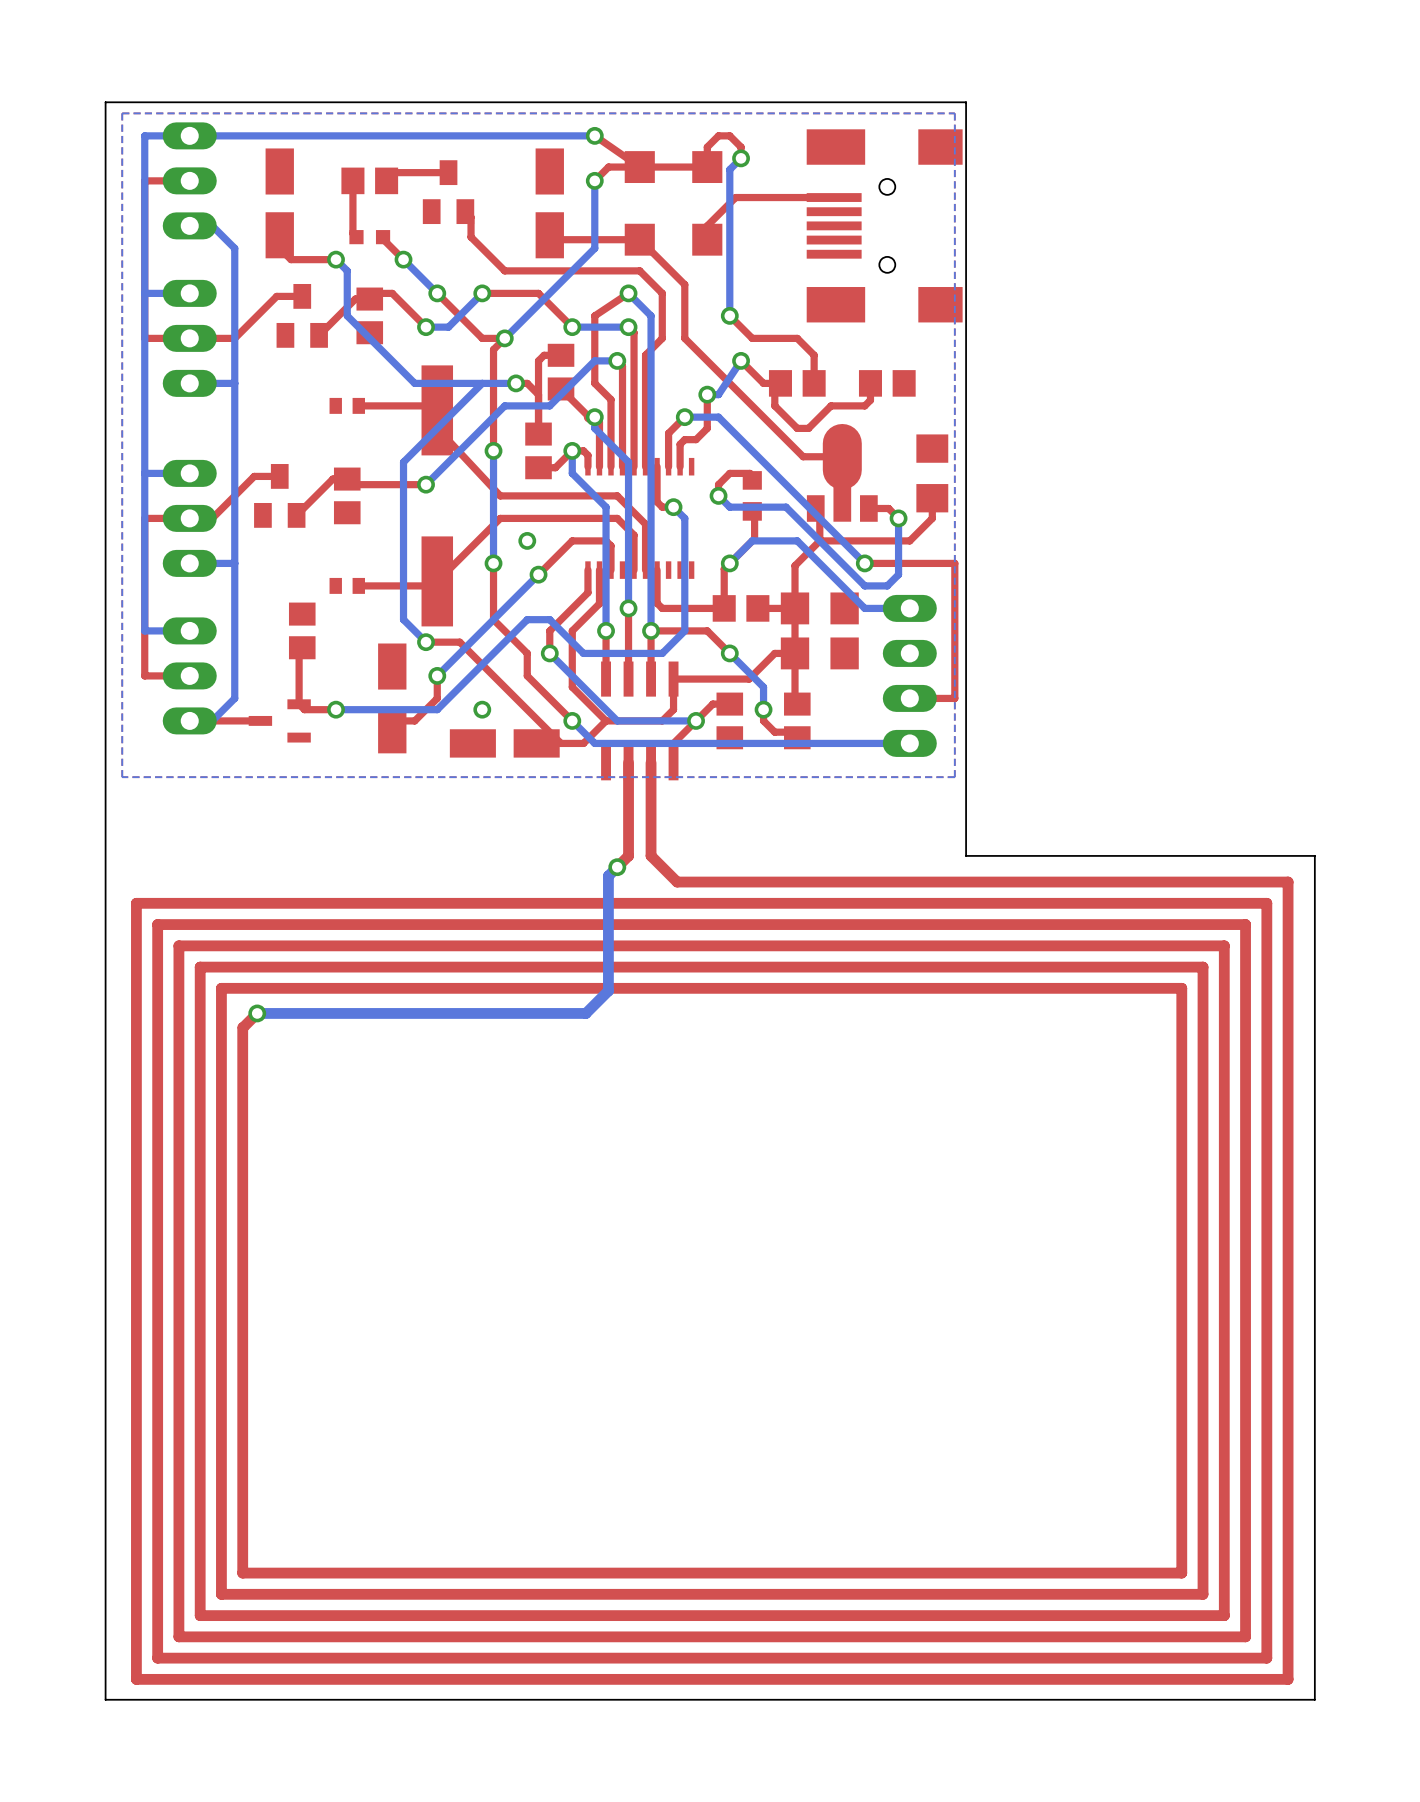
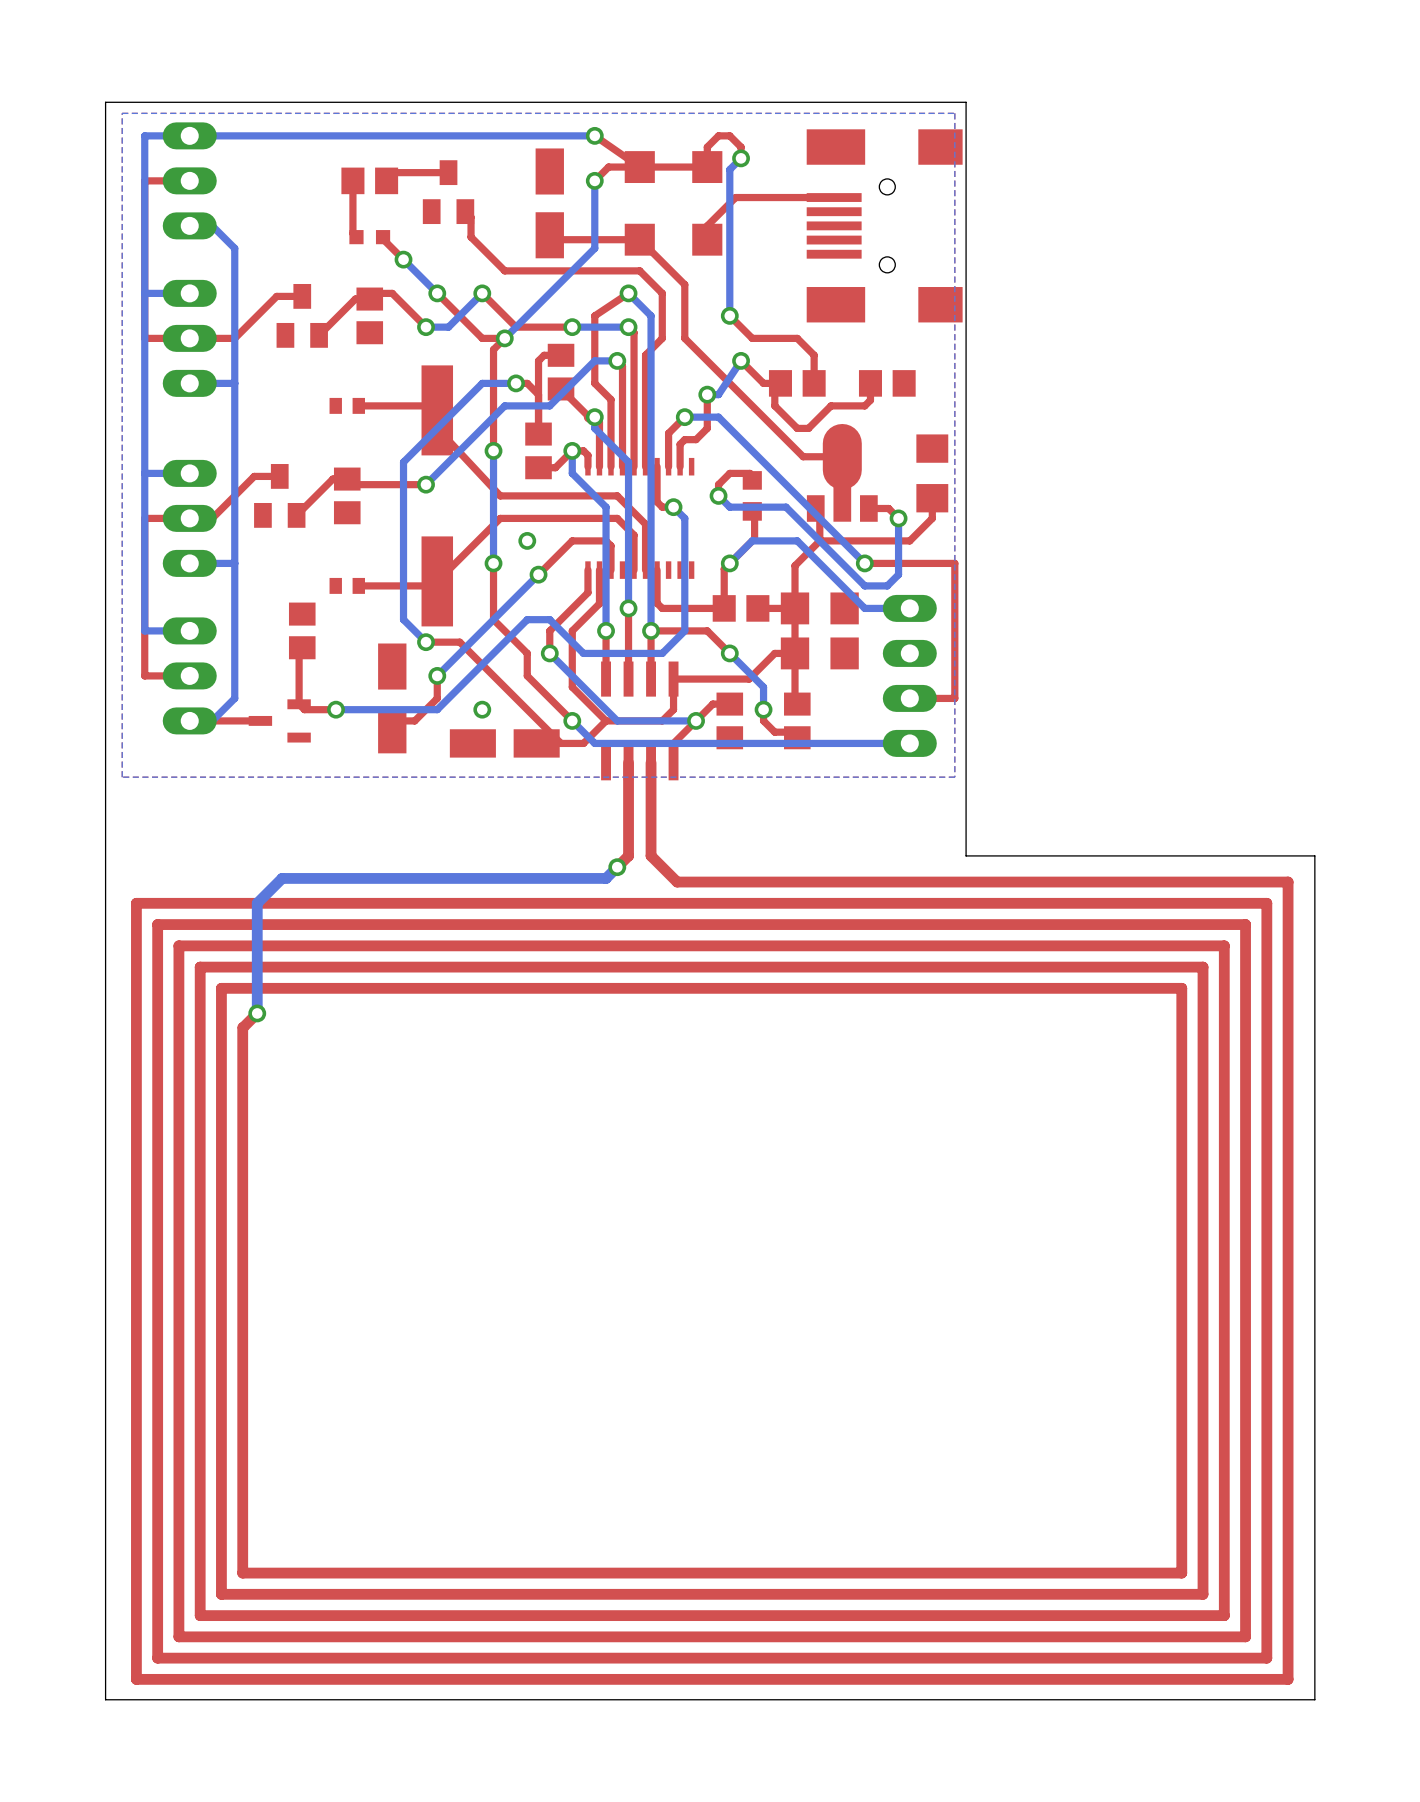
part: (279, 203) -> none
top track: (279, 235) (279, 248) (291, 259) (336, 259) -> none
bottom track: (336, 259) (347, 270) (347, 315) (414, 383) (482, 383) -> none
via: (336, 259) -> none
top track: (482, 293) (538, 293) (572, 327) -> (482, 293) (516, 327) (572, 327)
bottom track: (608, 876) (608, 990) (585, 1013) (257, 1013) -> (608, 876) (606, 878) (282, 878) (257, 903) (257, 1013)

